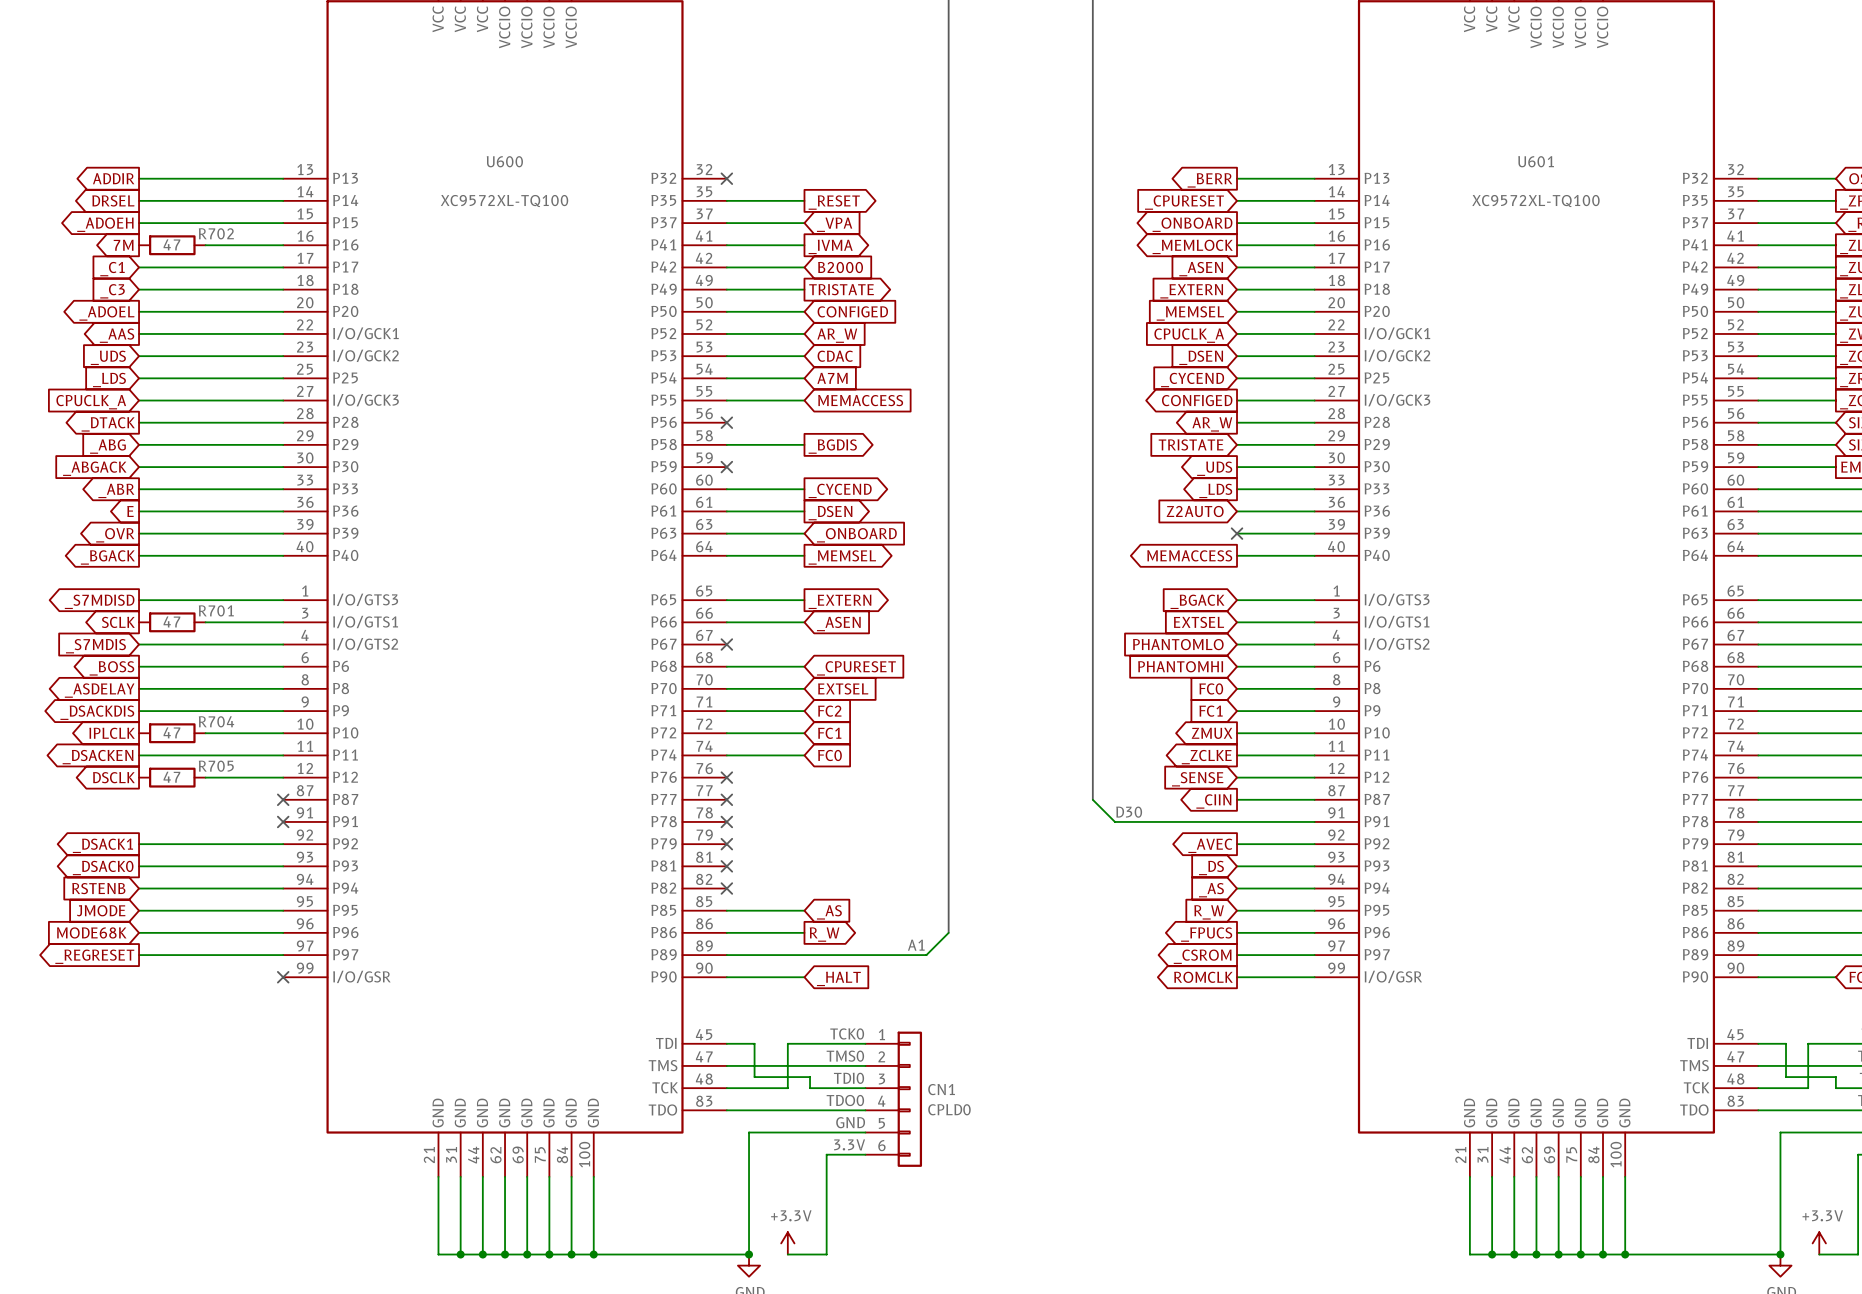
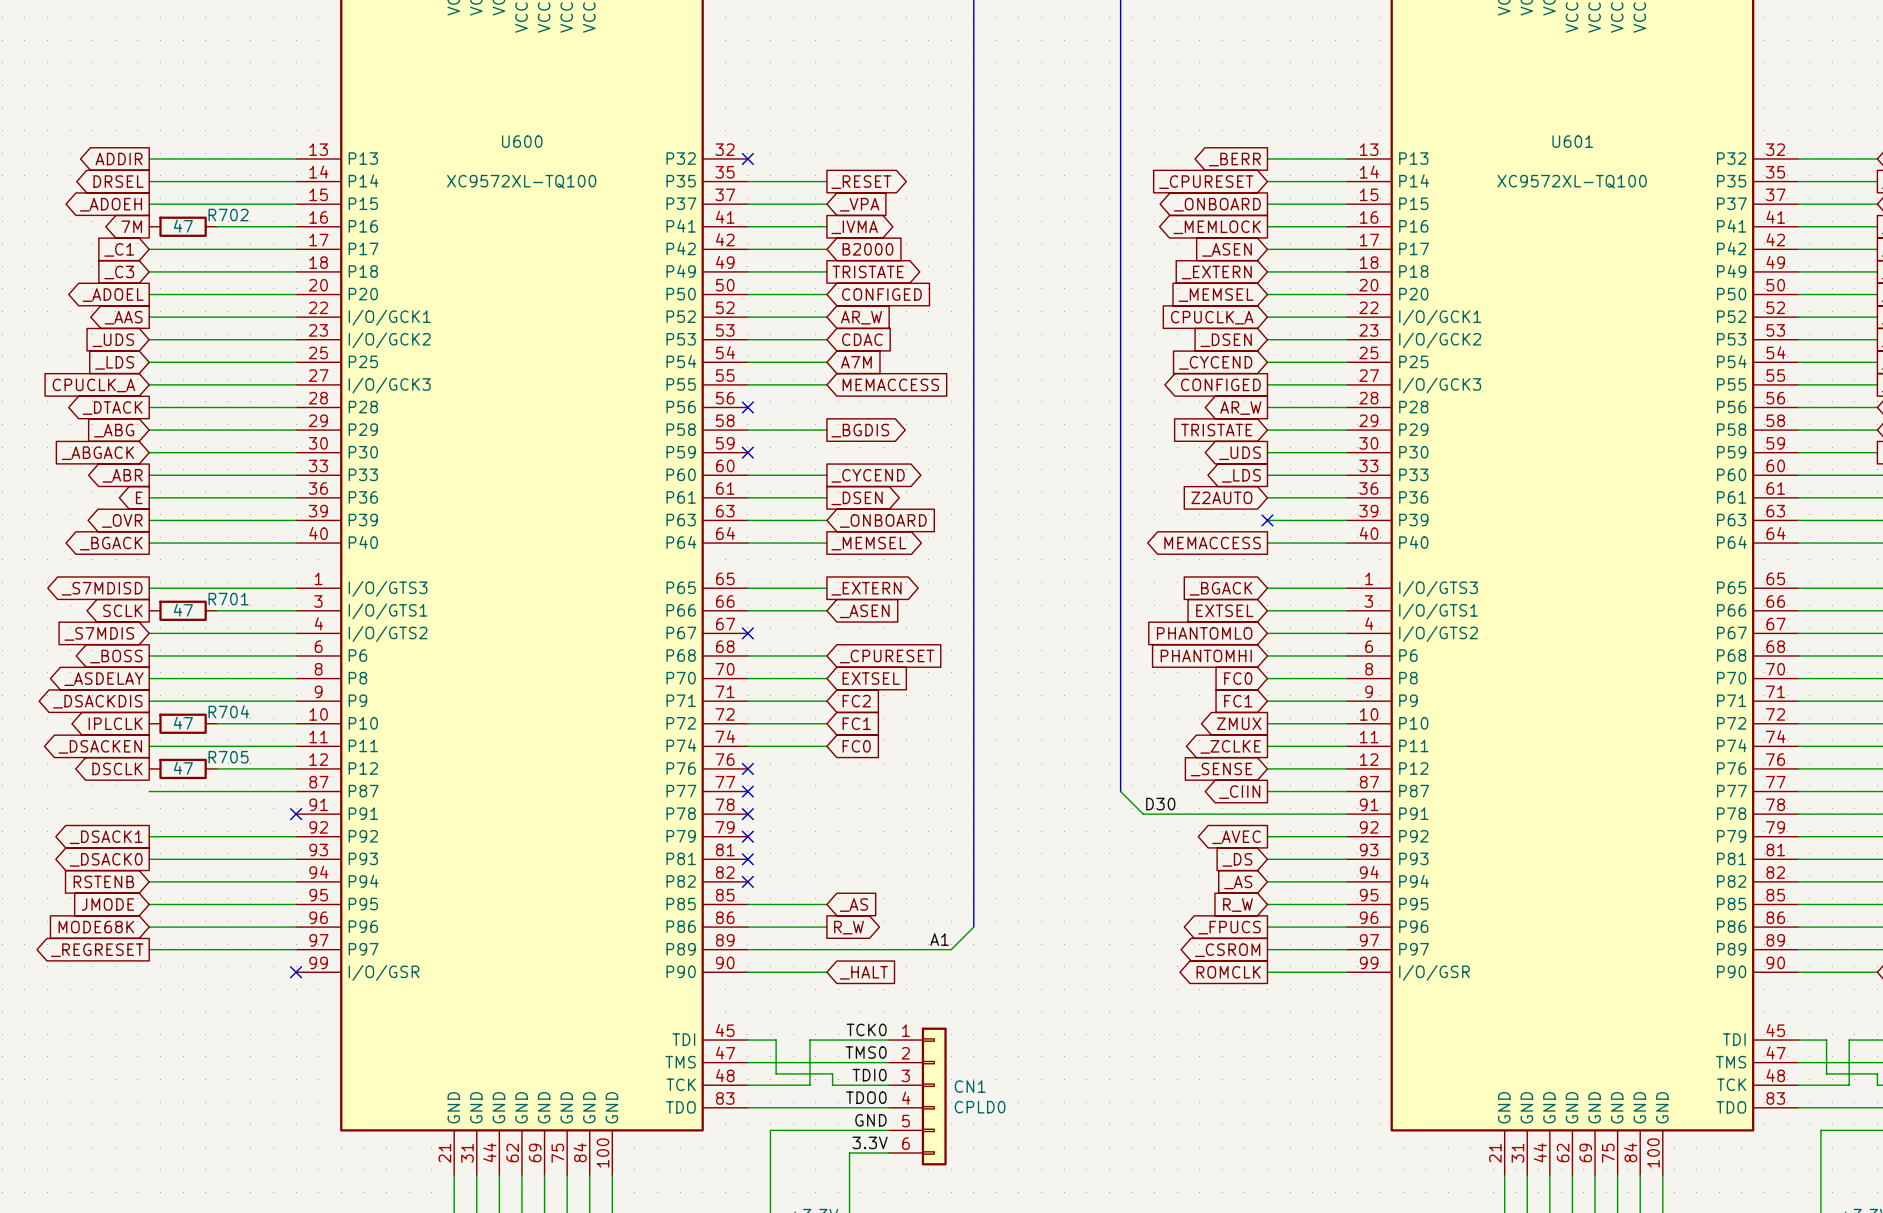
wire: none -> (149, 791) (296, 791)
no-connect mark: (283, 799) -> none

